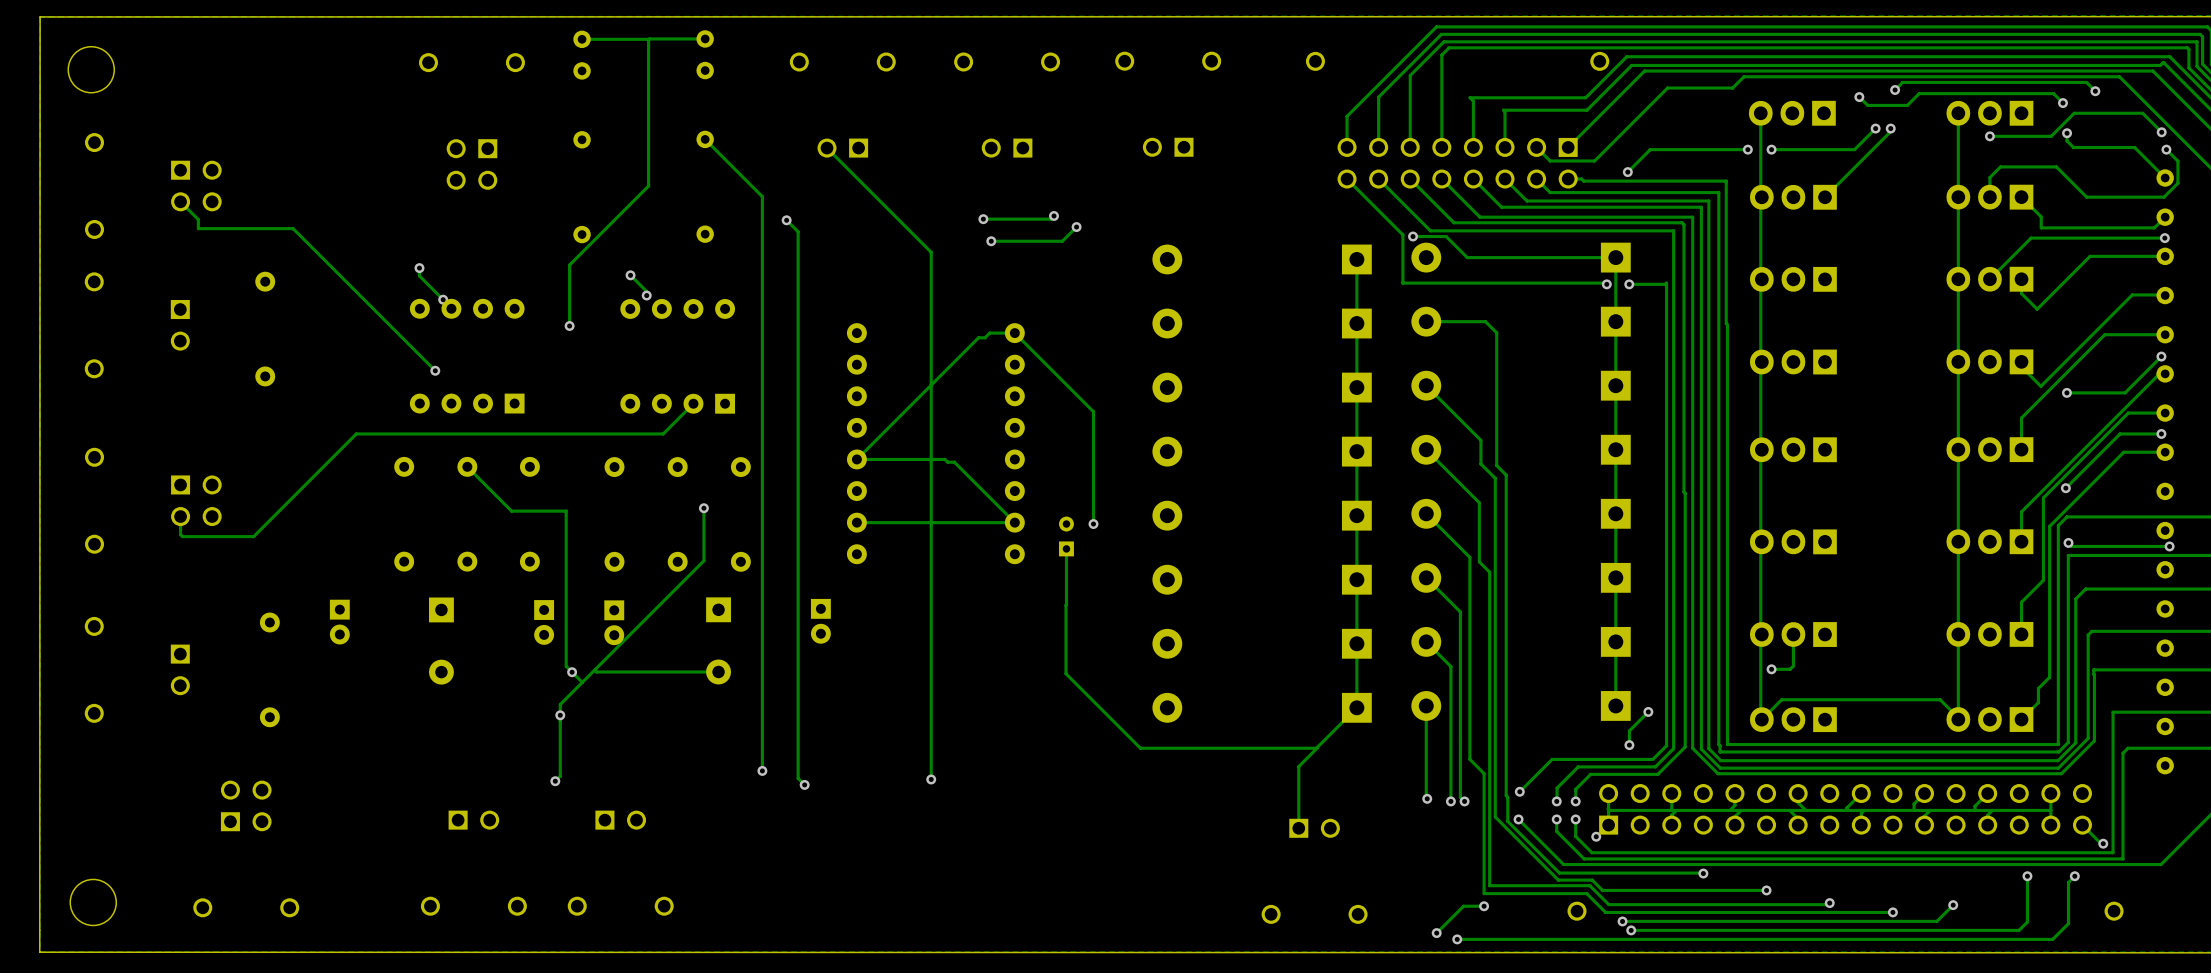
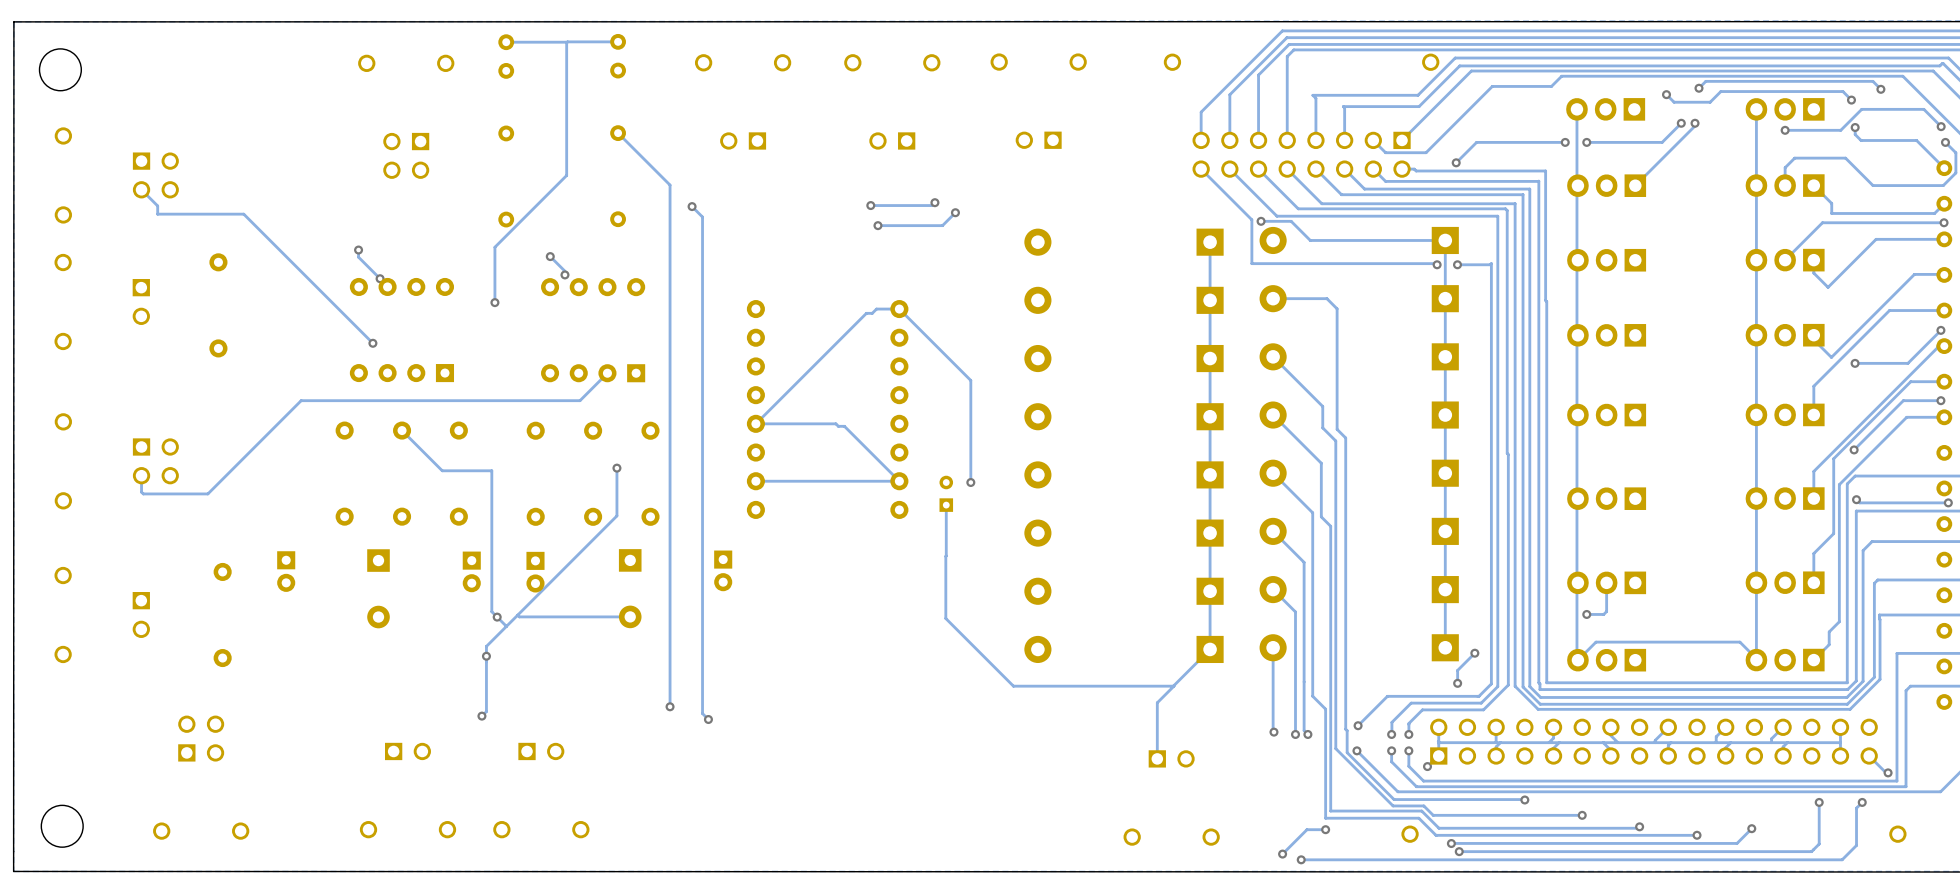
track: (827, 148) (931, 252) (931, 779) -> none
via: (931, 779) -> none

